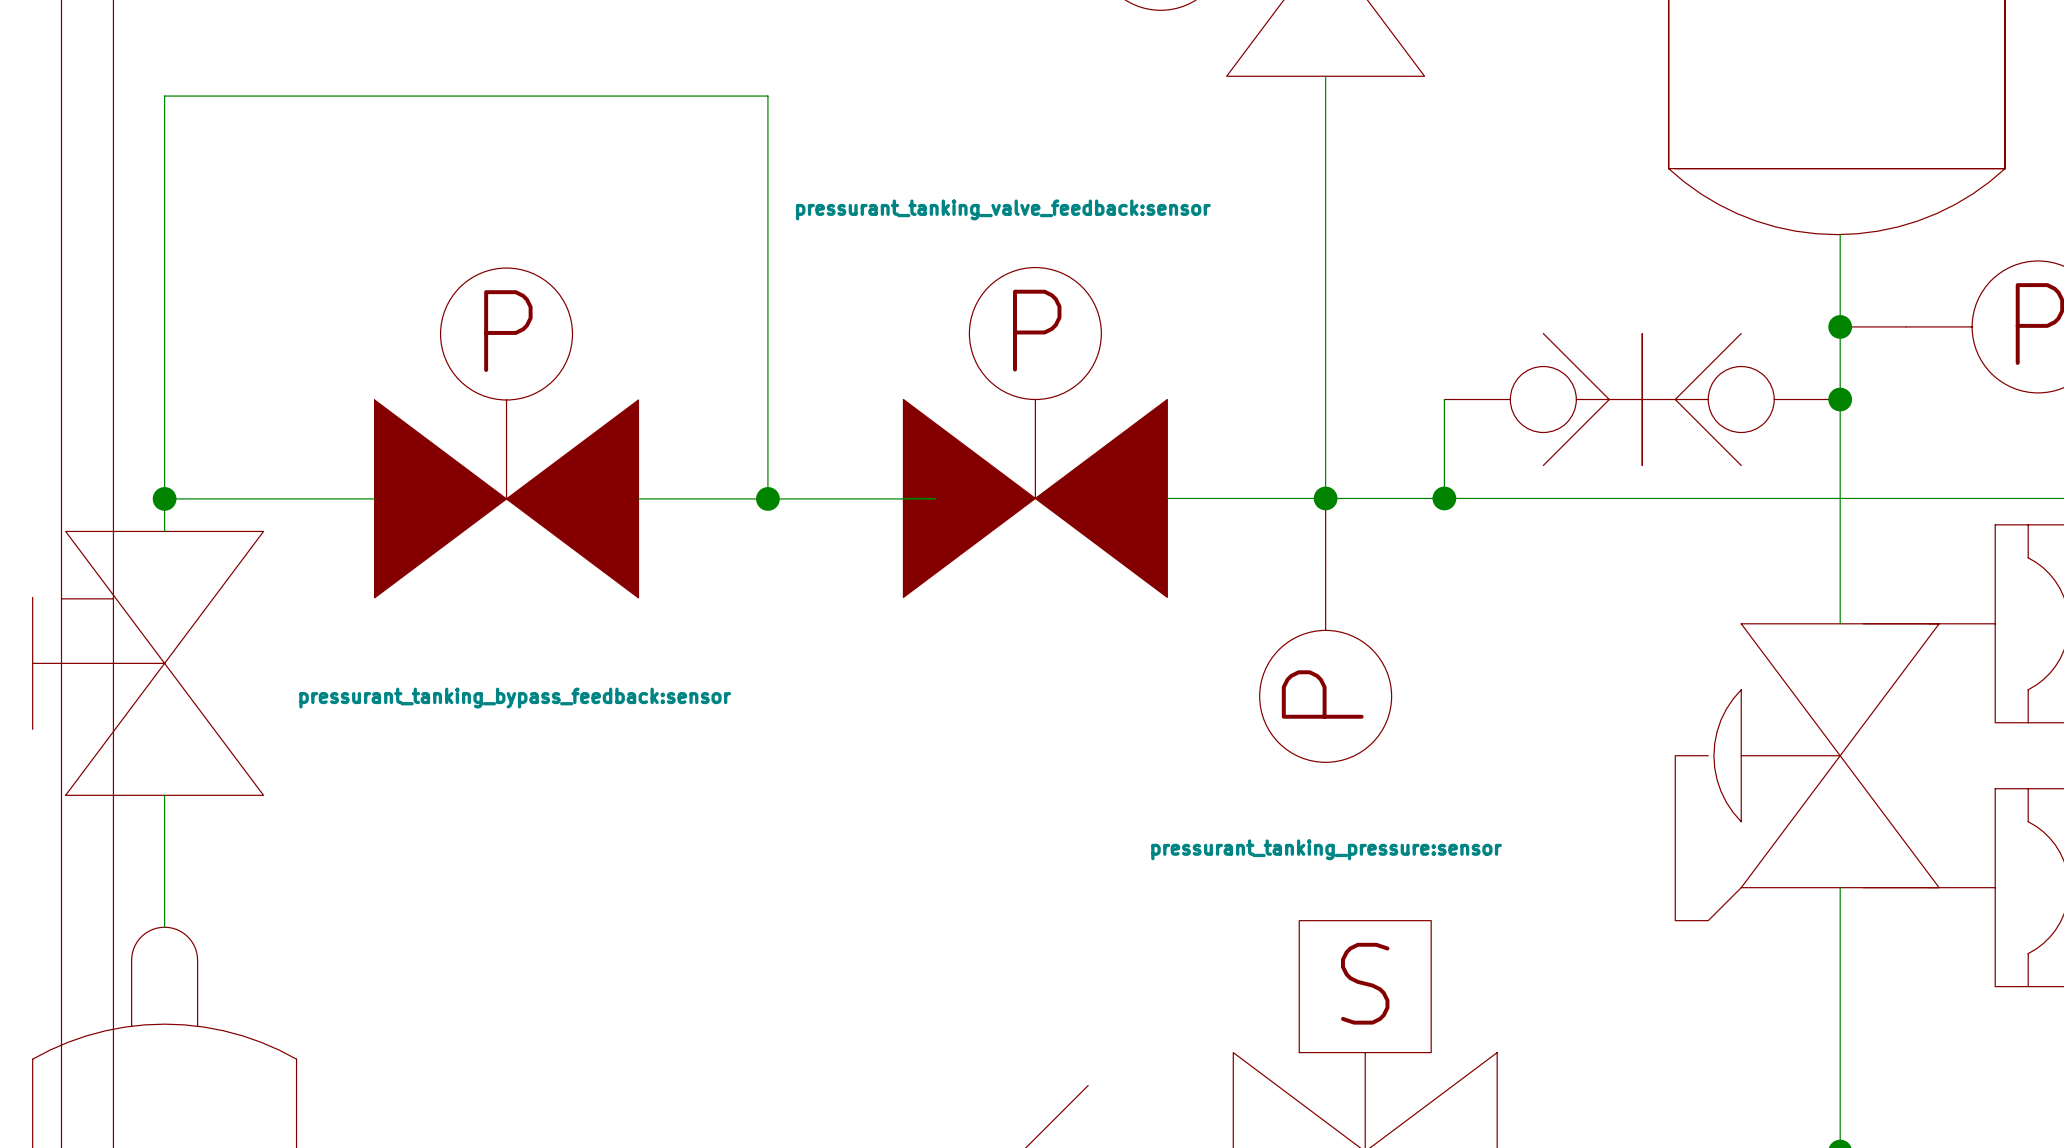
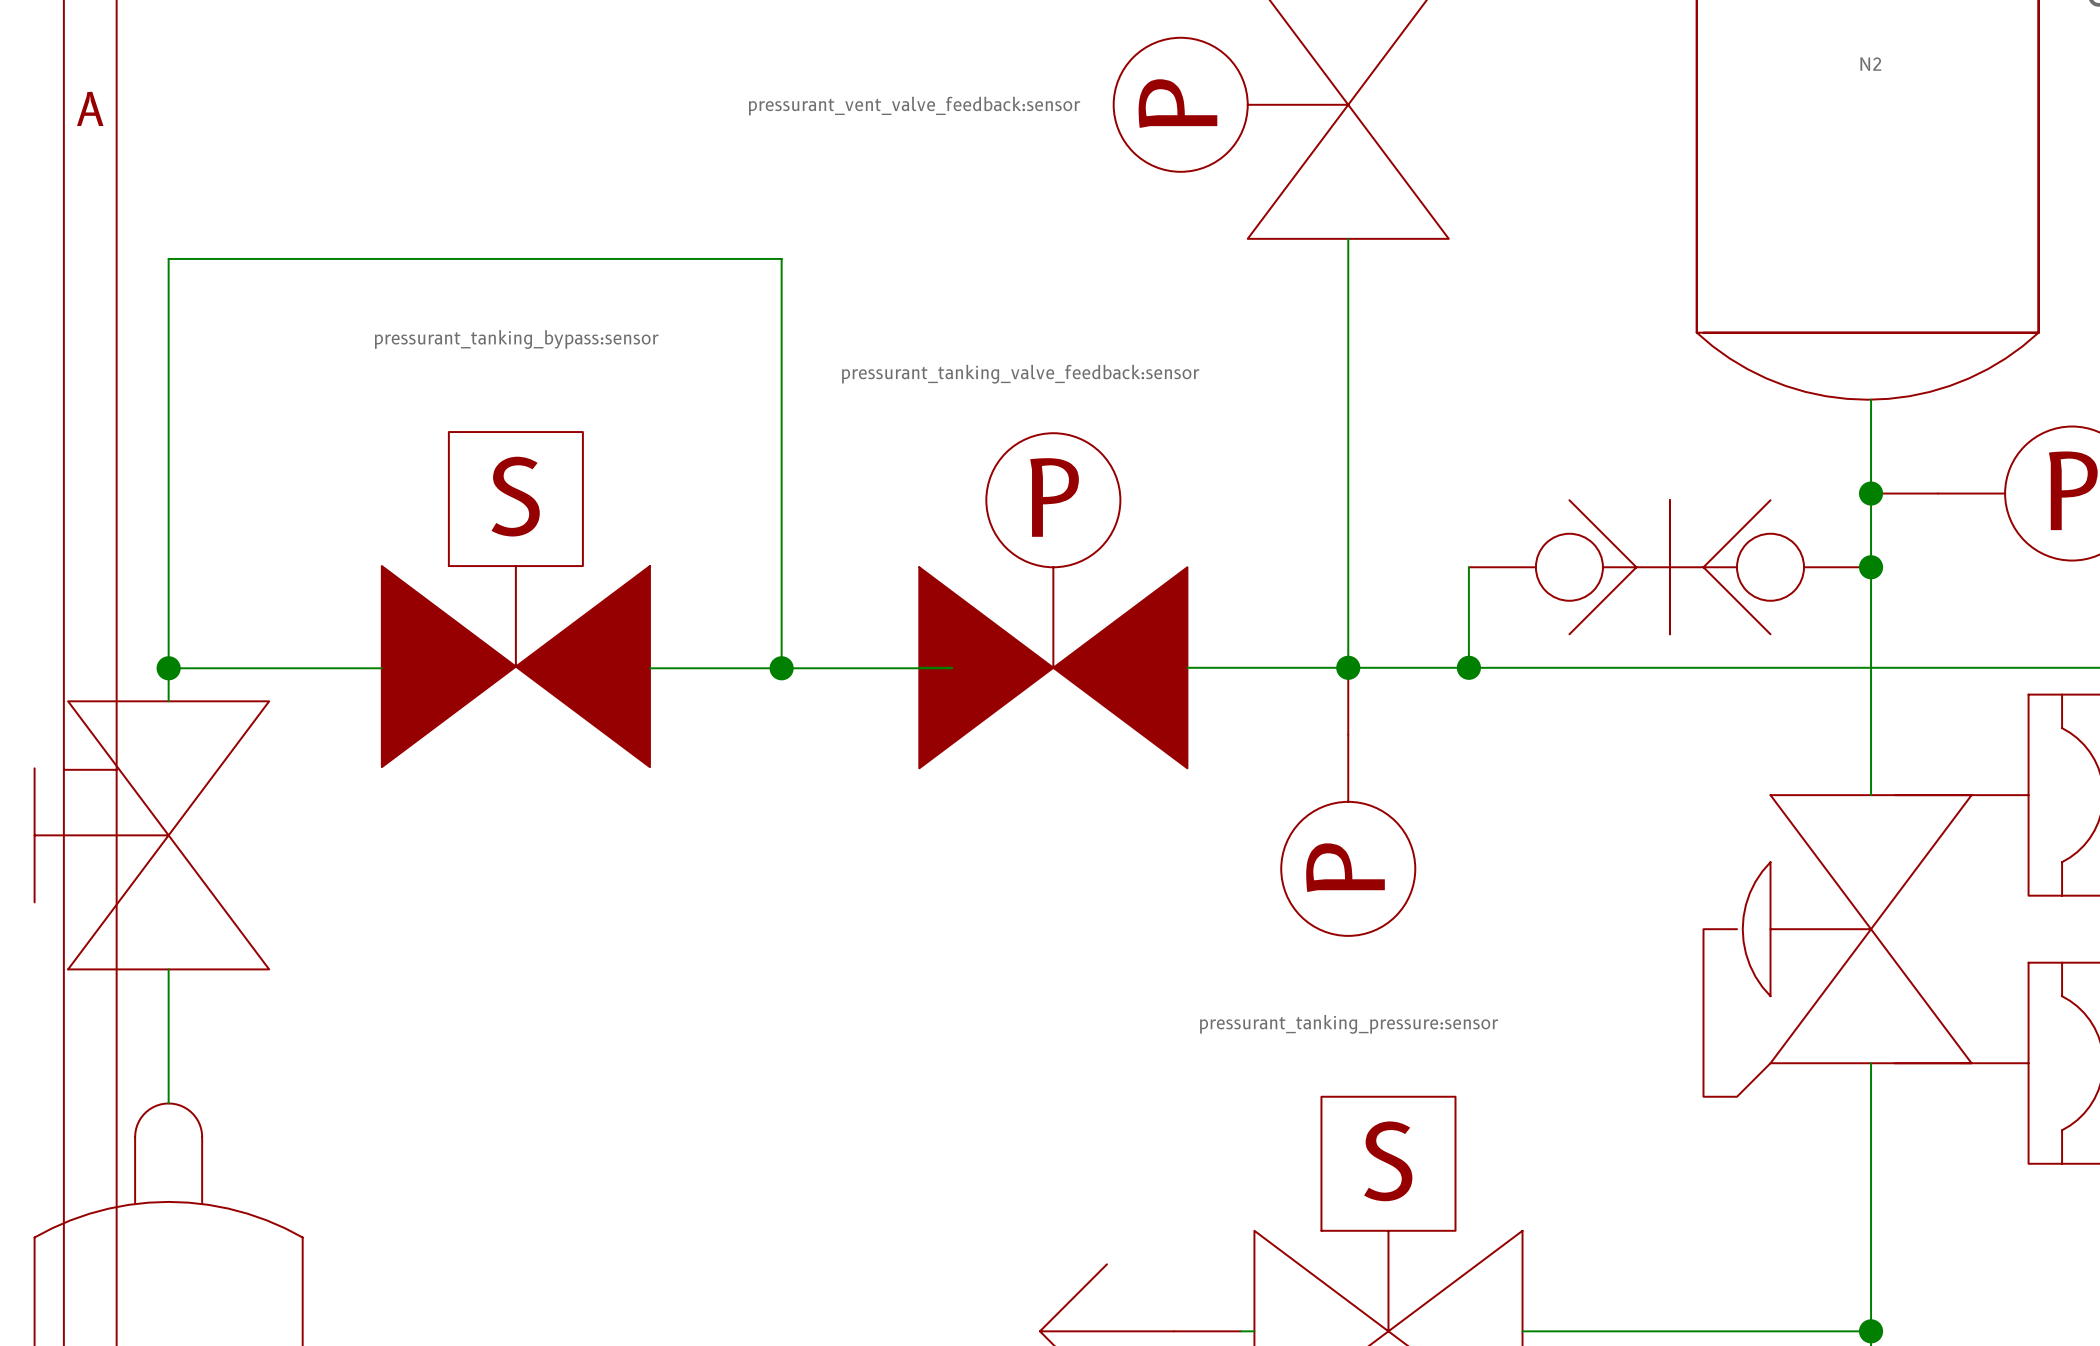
part symbol: [374, 268, 639, 598] -> [381, 432, 650, 768]
part value: pressurant_tanking_bypass_feedback:sensor (515, 698) -> pressurant_tanking_bypass:sensor (516, 339)

